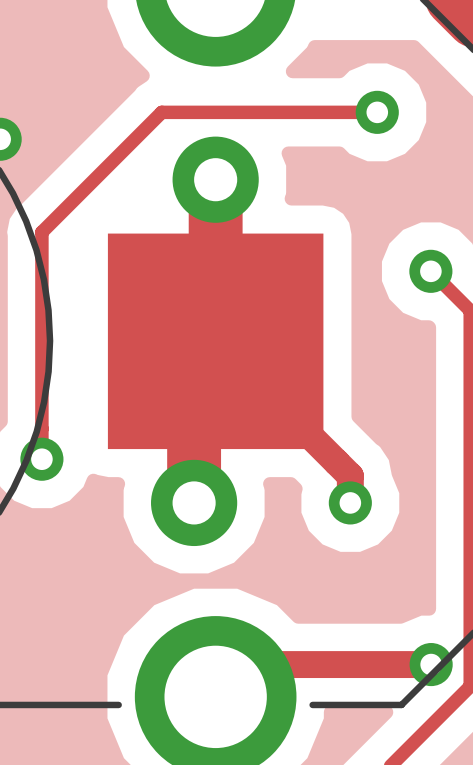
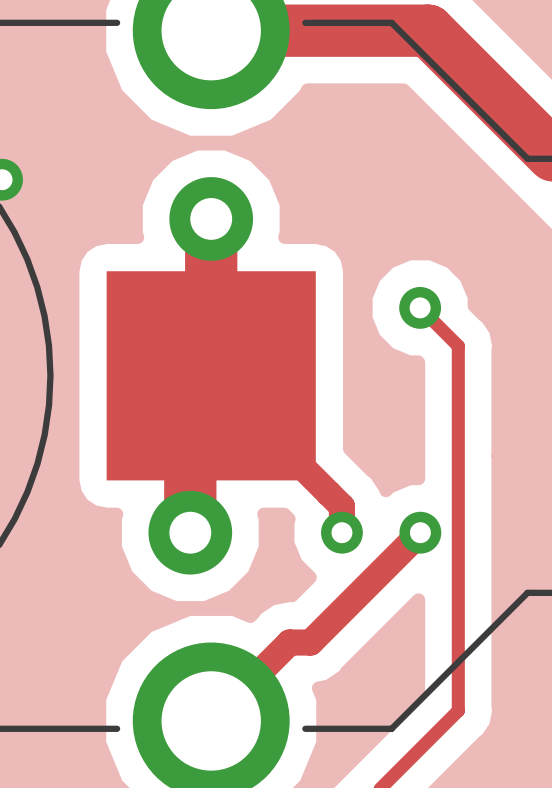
track: (377, 112) (161, 112) (41, 232) (41, 459) -> none
via: (377, 112) -> none
via: (41, 459) -> none
track: (247, 664) (431, 664) -> (242, 689) (289, 642) (310, 642) (420, 532)
via position: (431, 664) -> (420, 532)

